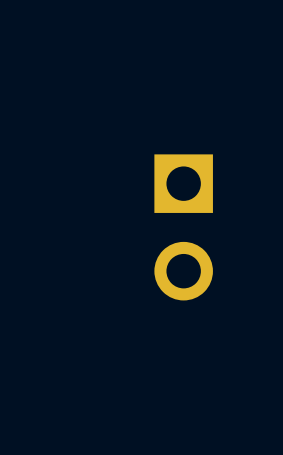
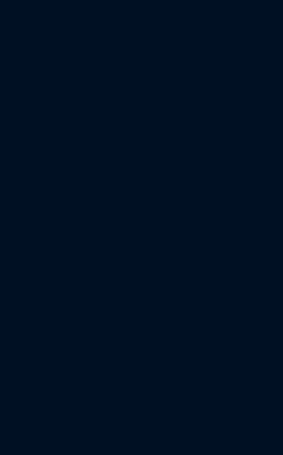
part: (183, 227) -> none

